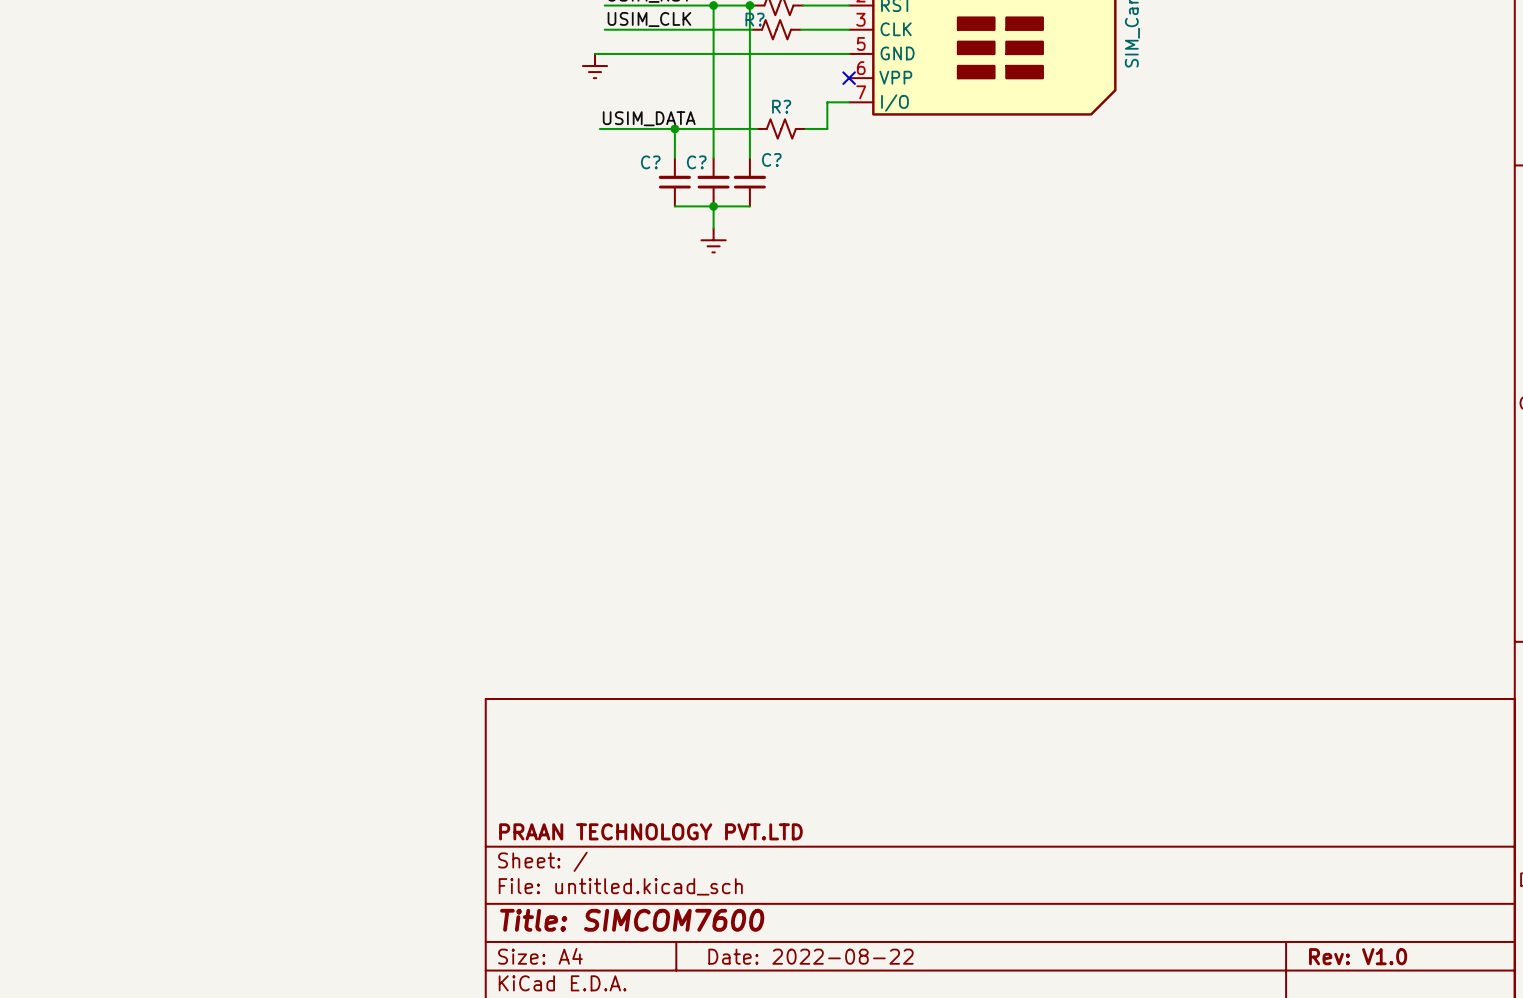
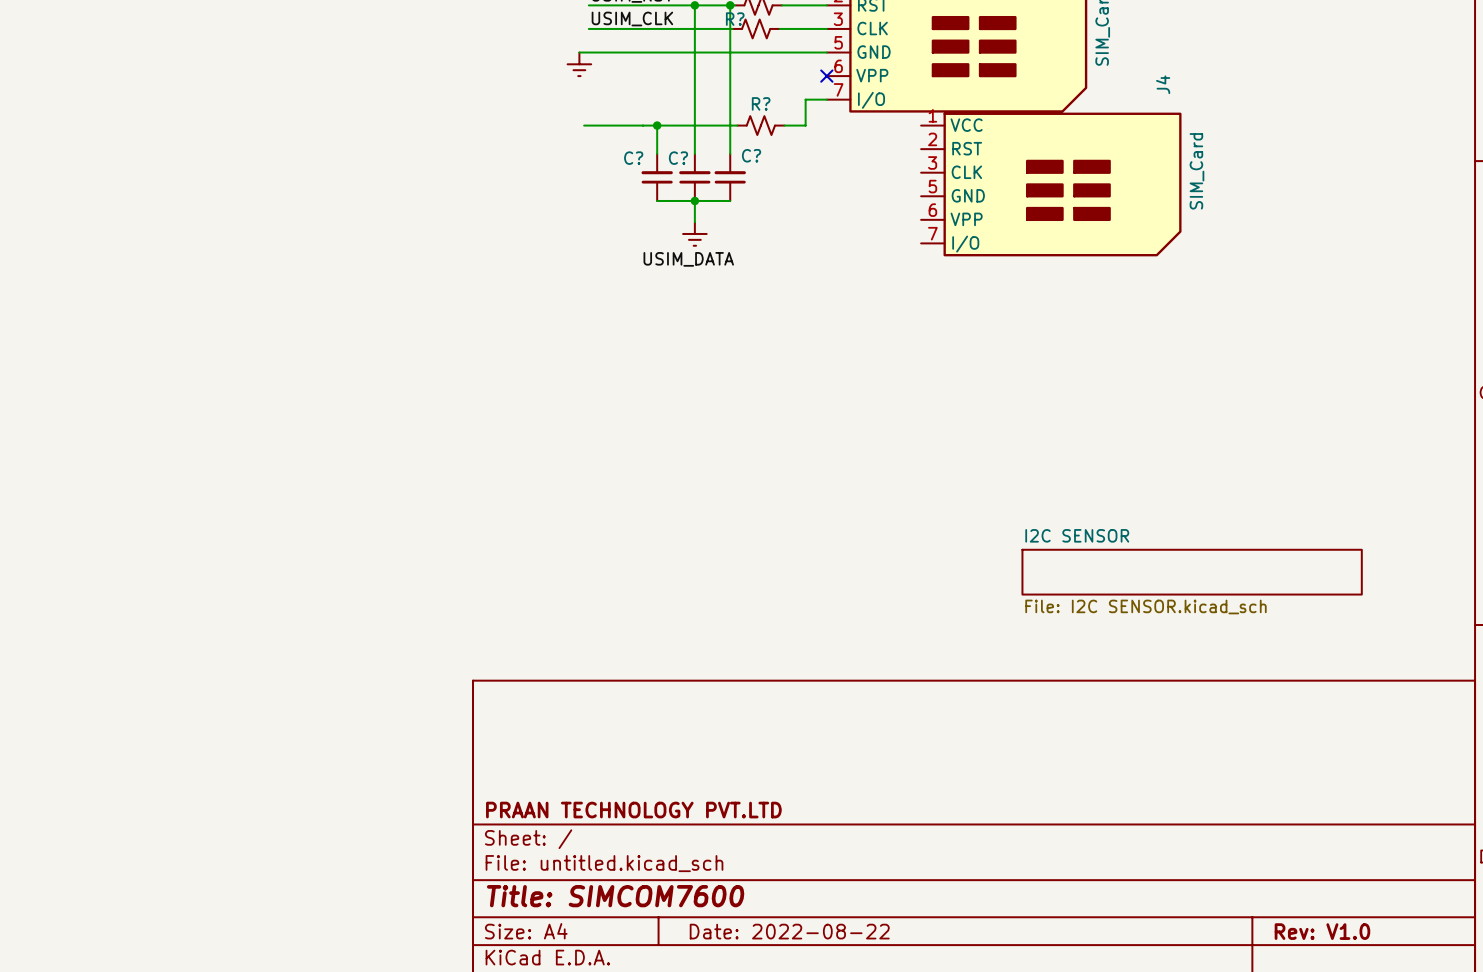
label position: USIM_DATA (649, 118) -> USIM_DATA (688, 259)
J4: none -> SIM_Card (1051, 184)
sheet I2C SENSOR: none -> File: I2C SENSOR.kicad_sch (1192, 572)

